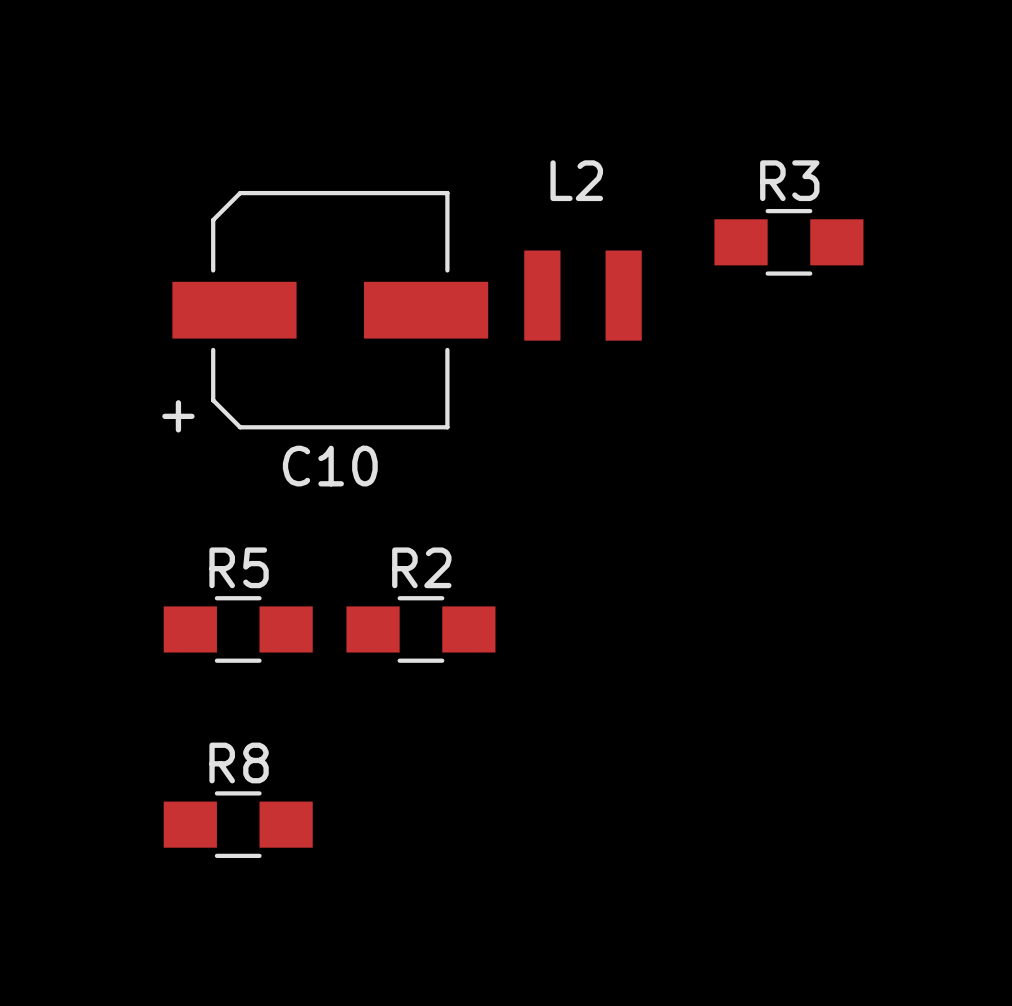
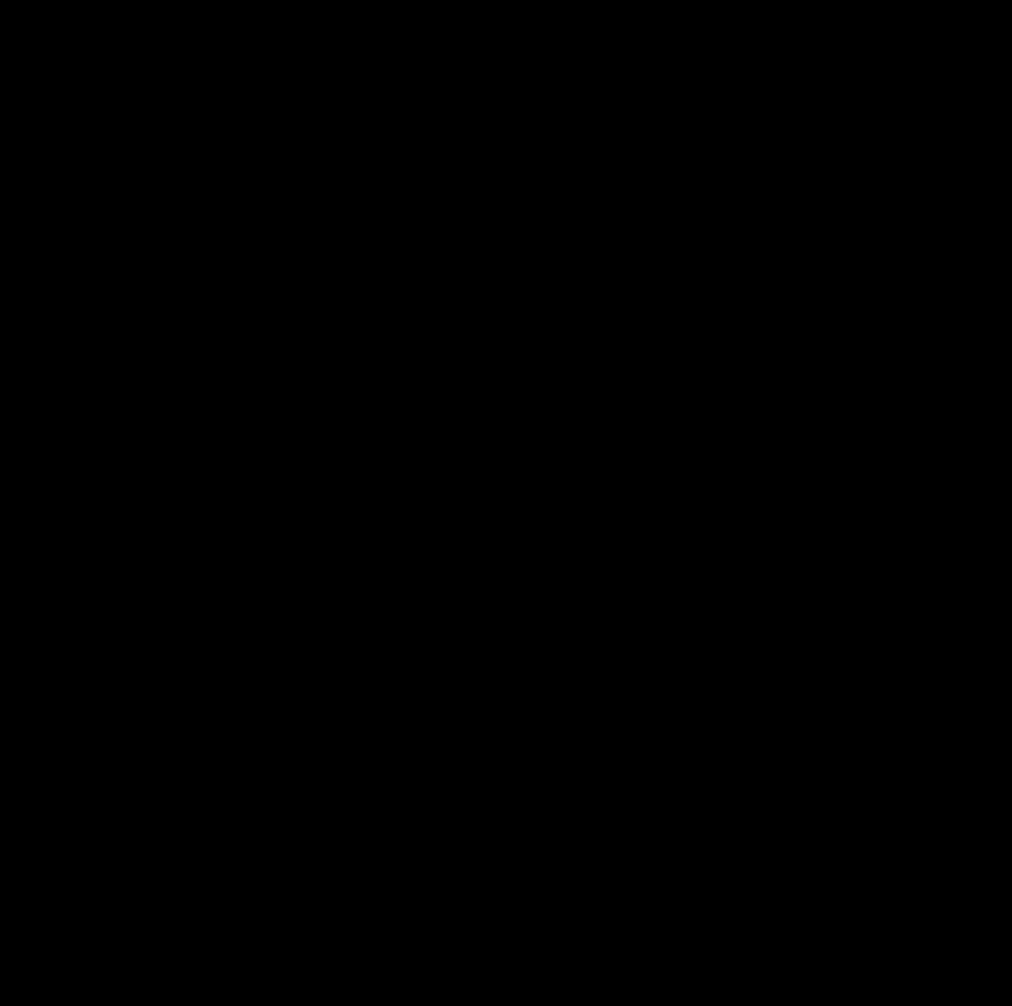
R3: (788, 242) -> none
L2: (583, 295) -> none
C10: (330, 310) -> none
R5: (238, 629) -> none
R2: (420, 629) -> none
R8: (238, 824) -> none

